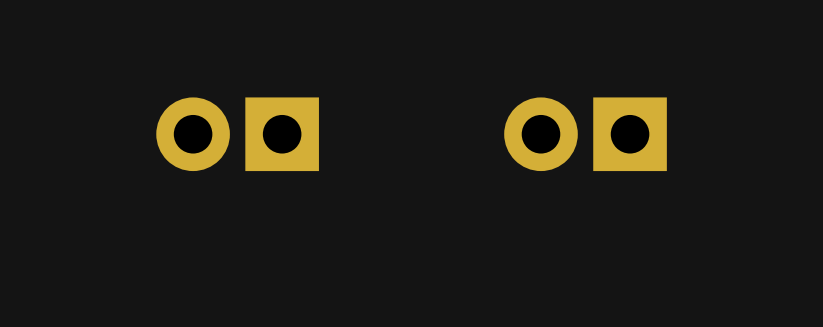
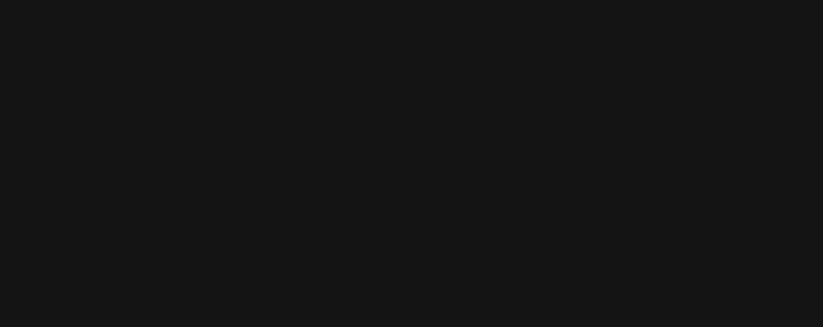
part: (237, 134) -> none
part: (585, 134) -> none

